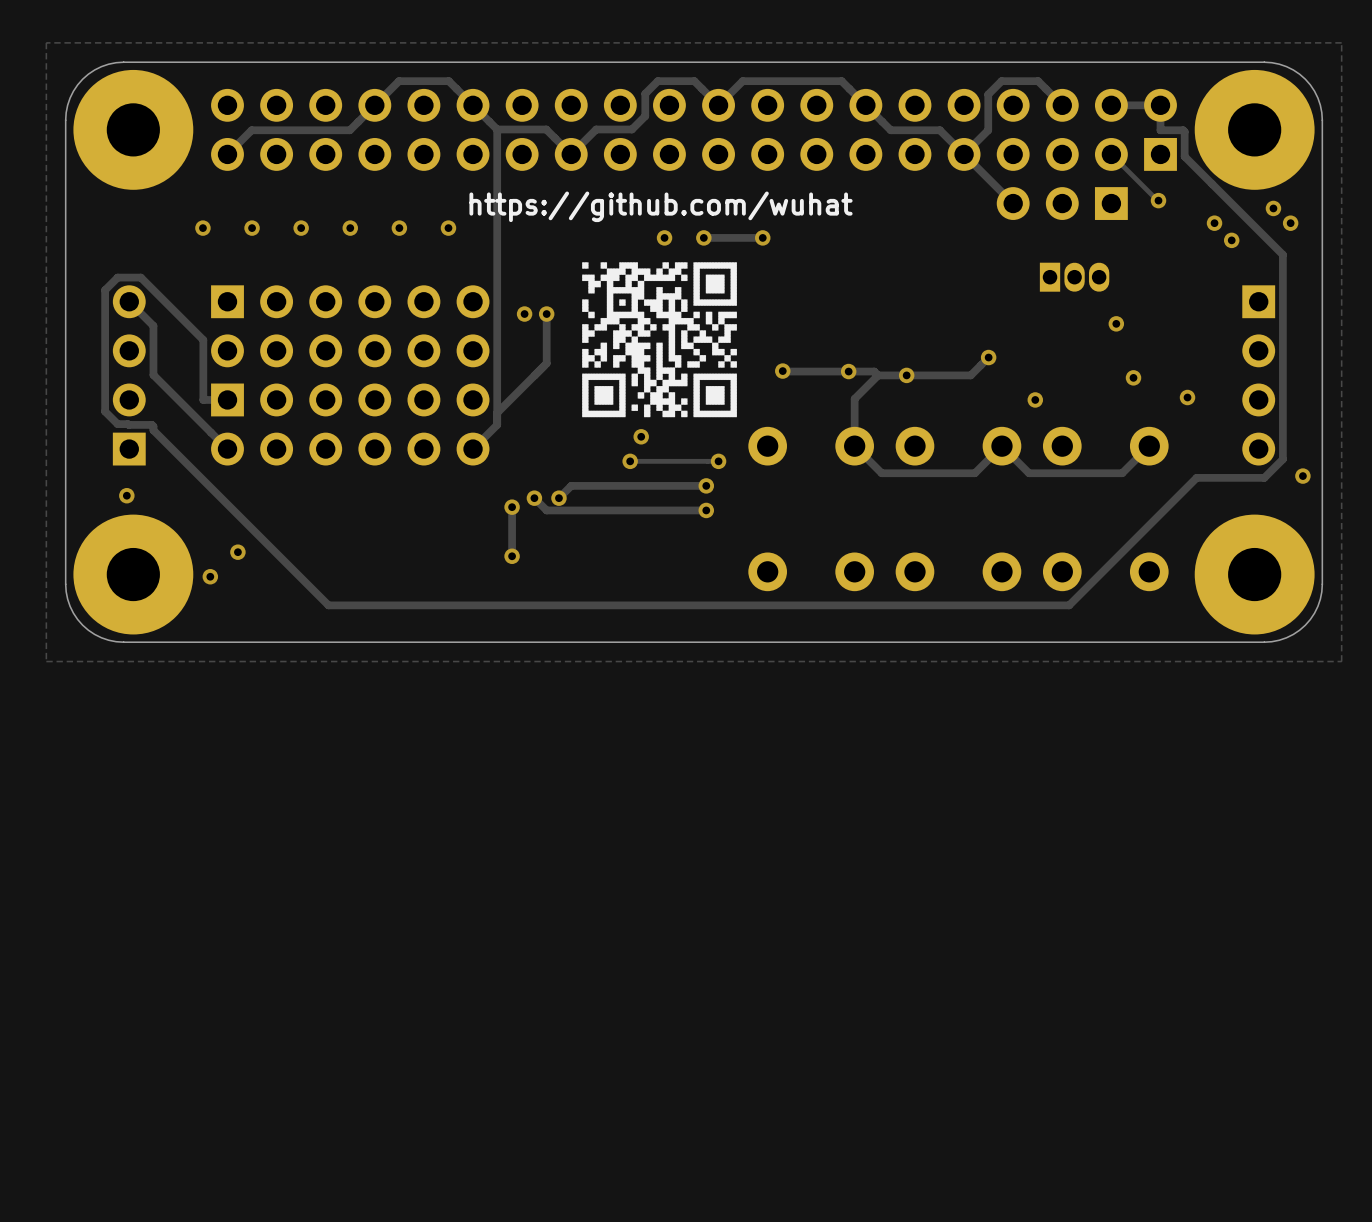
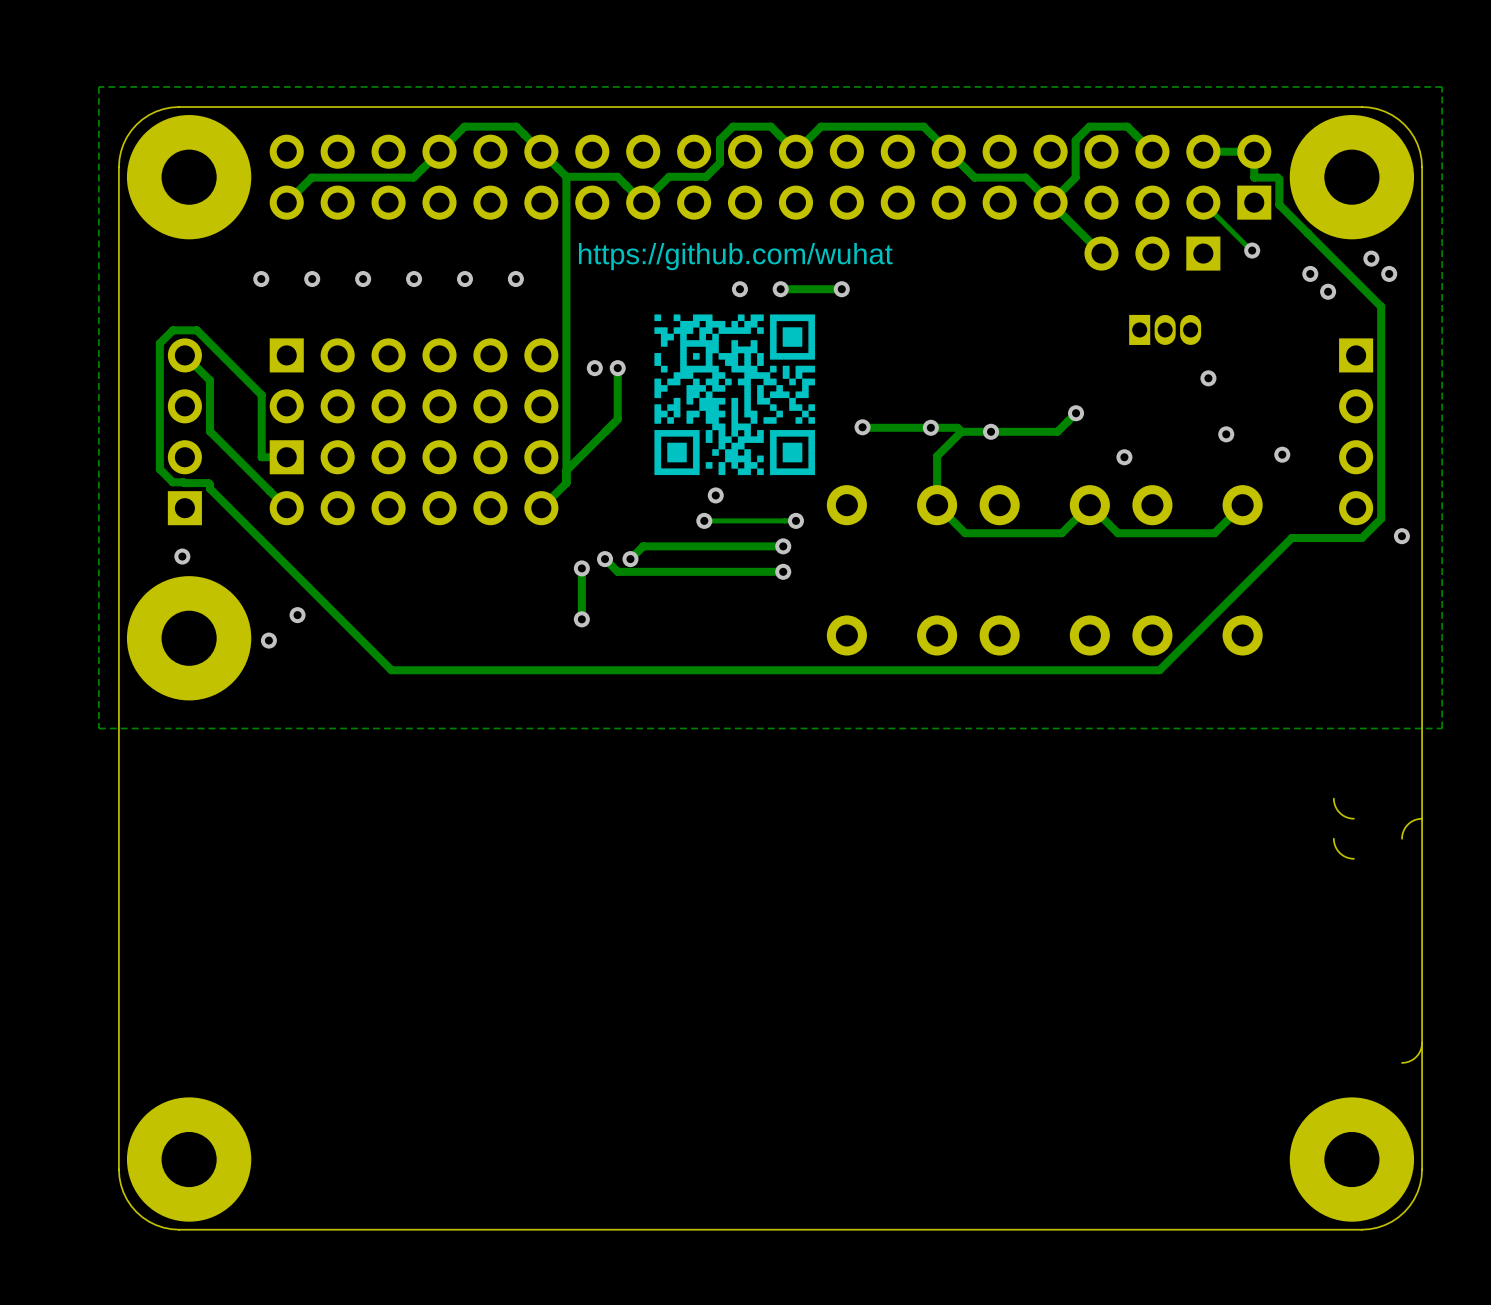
part: (1254, 574) -> none
board edge: (1322, 584) (1317, 606) (1305, 625) (1286, 637) (1264, 642) (123, 642) (101, 637) (82, 625) (70, 606) (65, 584) -> (1422, 648) (1421, 1177) (1414, 1199) (1398, 1217) (1384, 1225) (1361, 1229) (179, 1229) (156, 1225) (142, 1217) (131, 1206) (123, 1192) (118, 1169) (118, 648)
board edge: none -> (1333, 798) (1335, 806) (1339, 812) (1346, 817) (1353, 818)
board edge: none -> (1422, 818) (1414, 820) (1407, 824) (1403, 831) (1402, 838)
board edge: none -> (1333, 838) (1335, 846) (1339, 852) (1346, 857) (1353, 858)
board edge: none -> (1422, 1042) (1420, 1050) (1416, 1057) (1409, 1061) (1402, 1062)
part: none -> (189, 1159)
part: none -> (1351, 1159)

